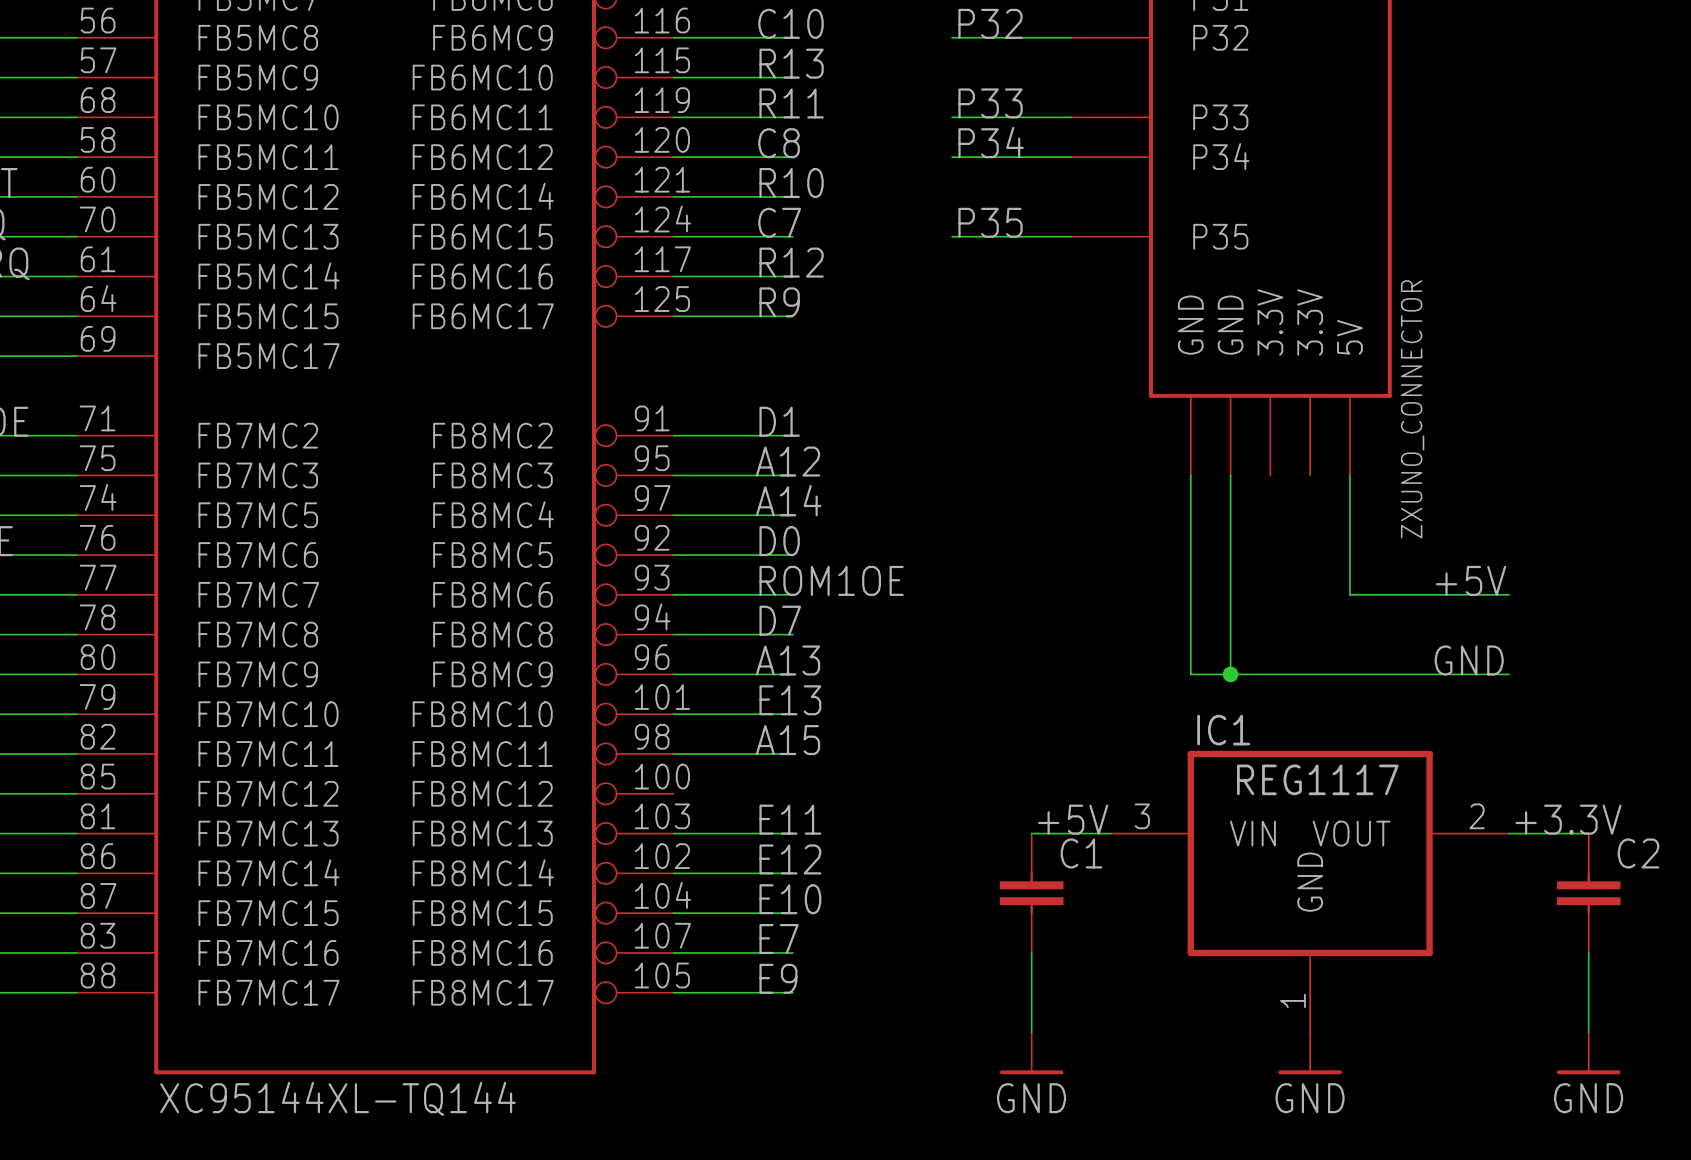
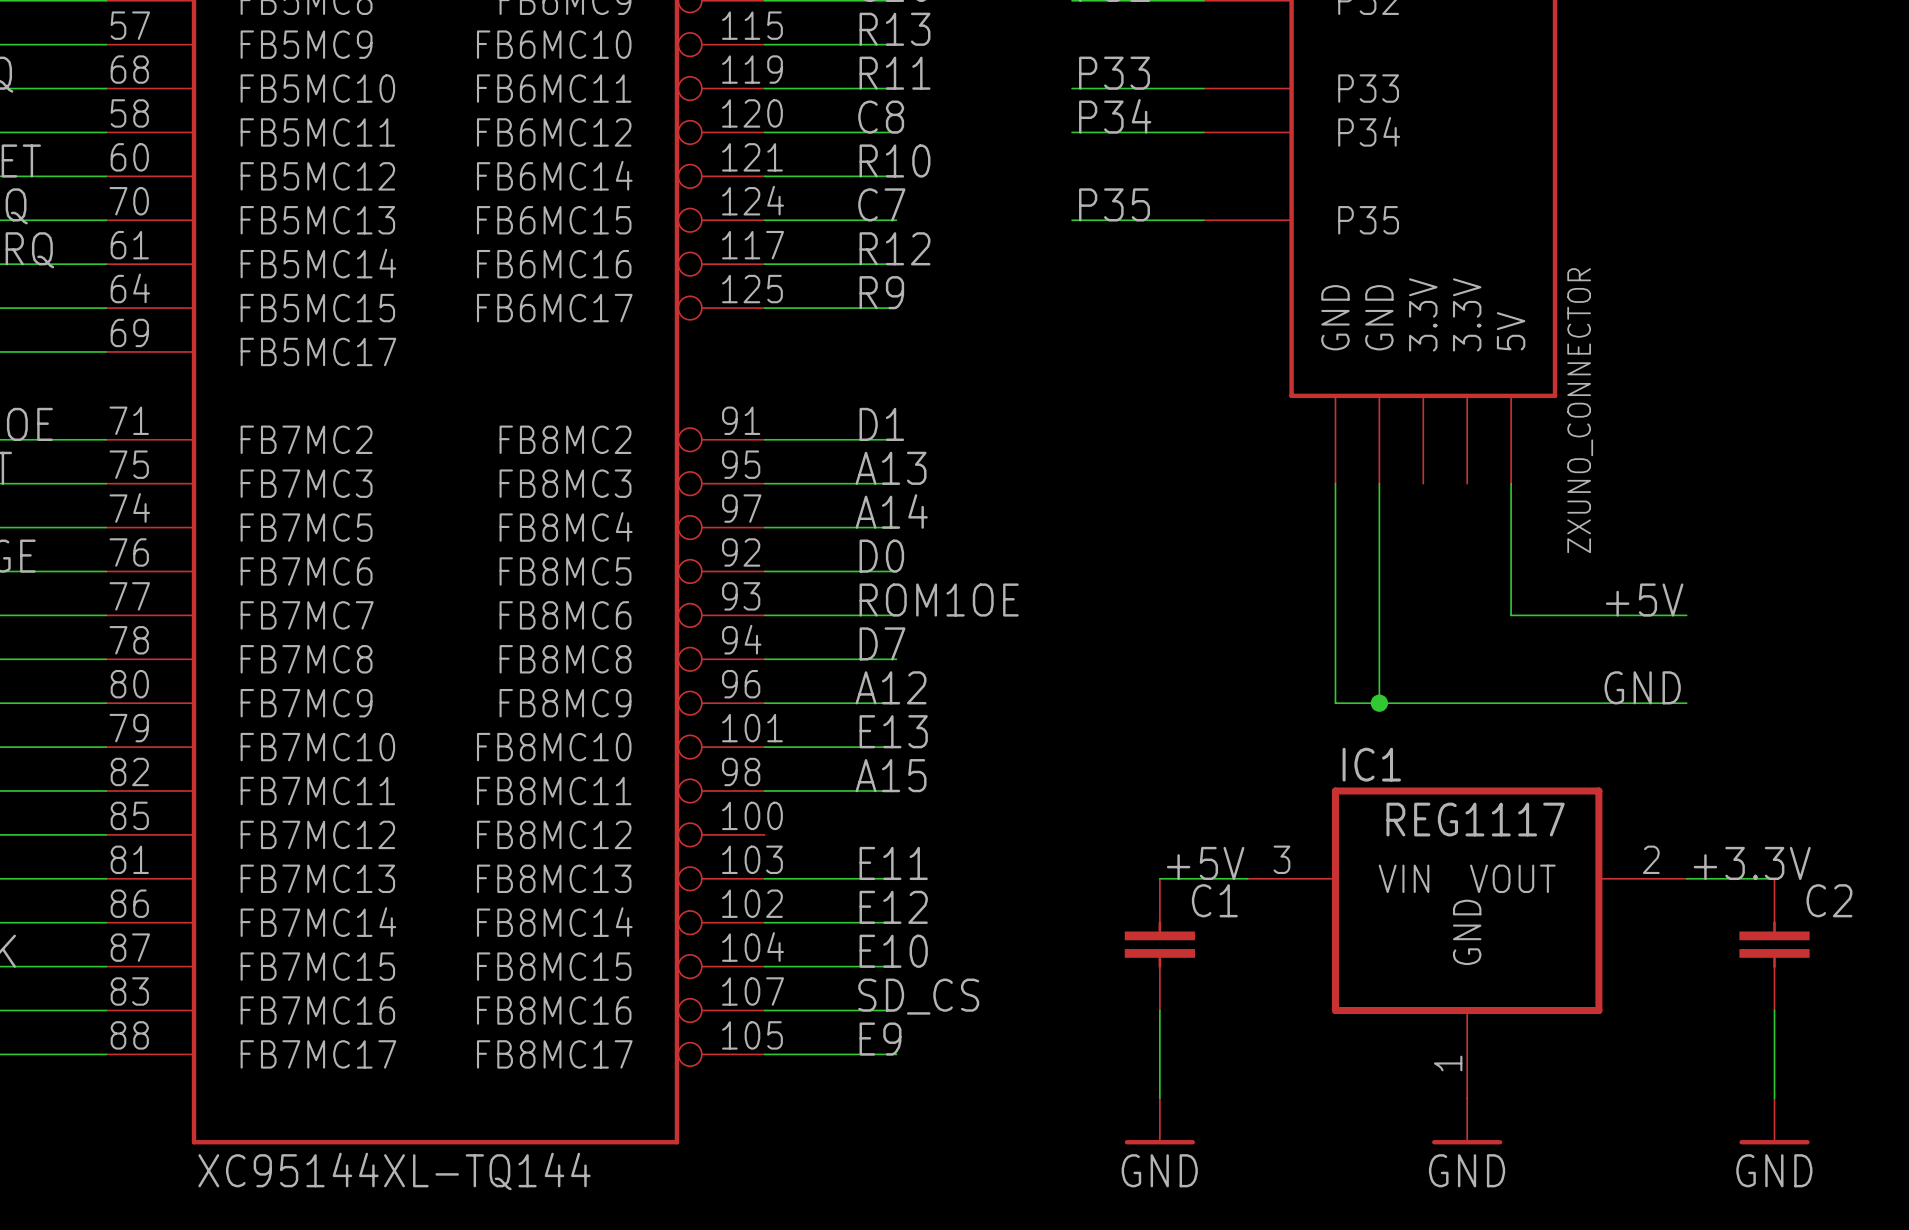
label: A12 (788, 461) -> A13 (891, 468)
label: A13 (788, 660) -> A12 (891, 687)
label: E7 (779, 939) -> SD_CS (918, 996)

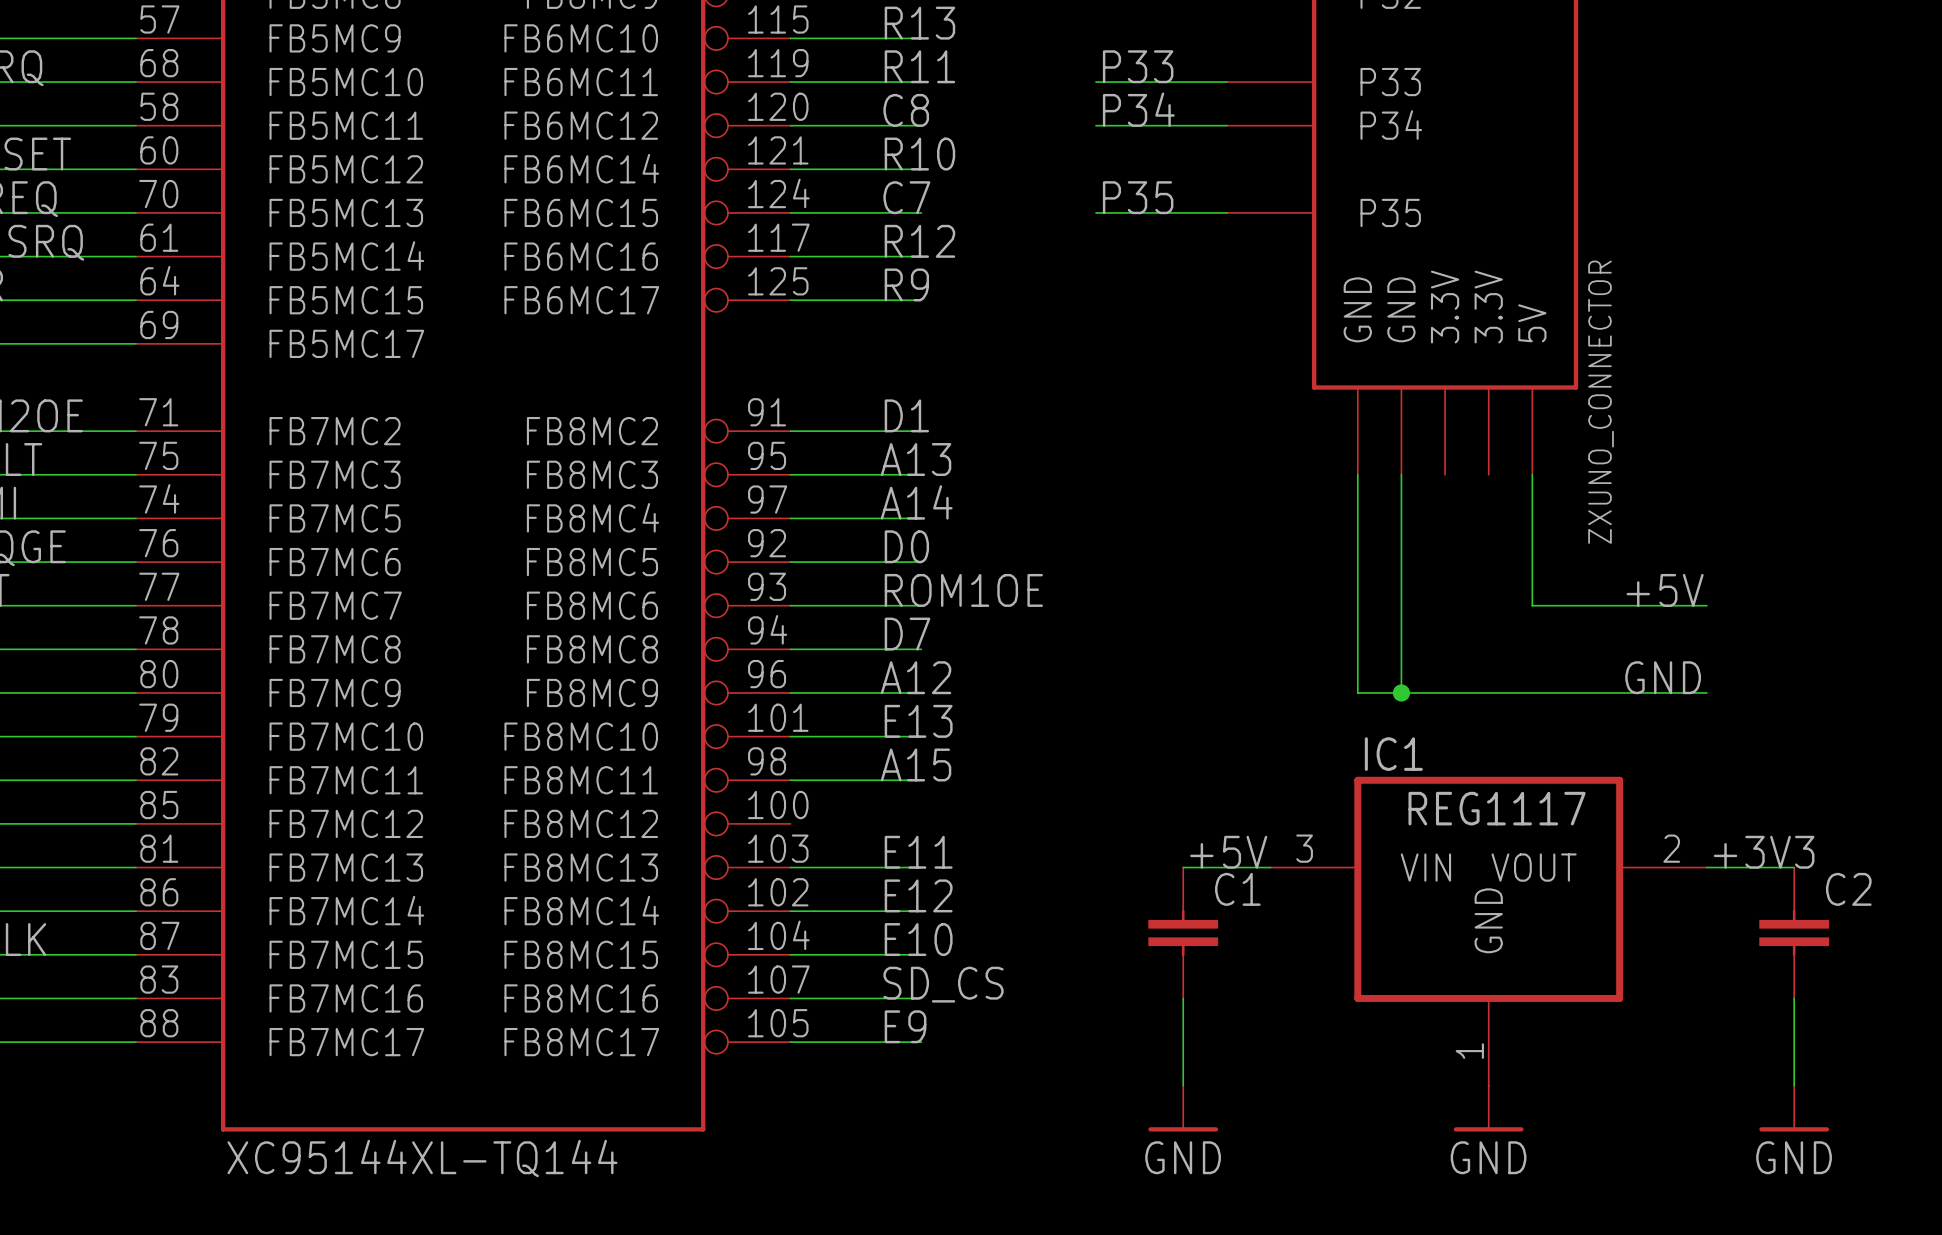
label: +3.3V (1752, 863) -> +3V3 (1764, 852)

